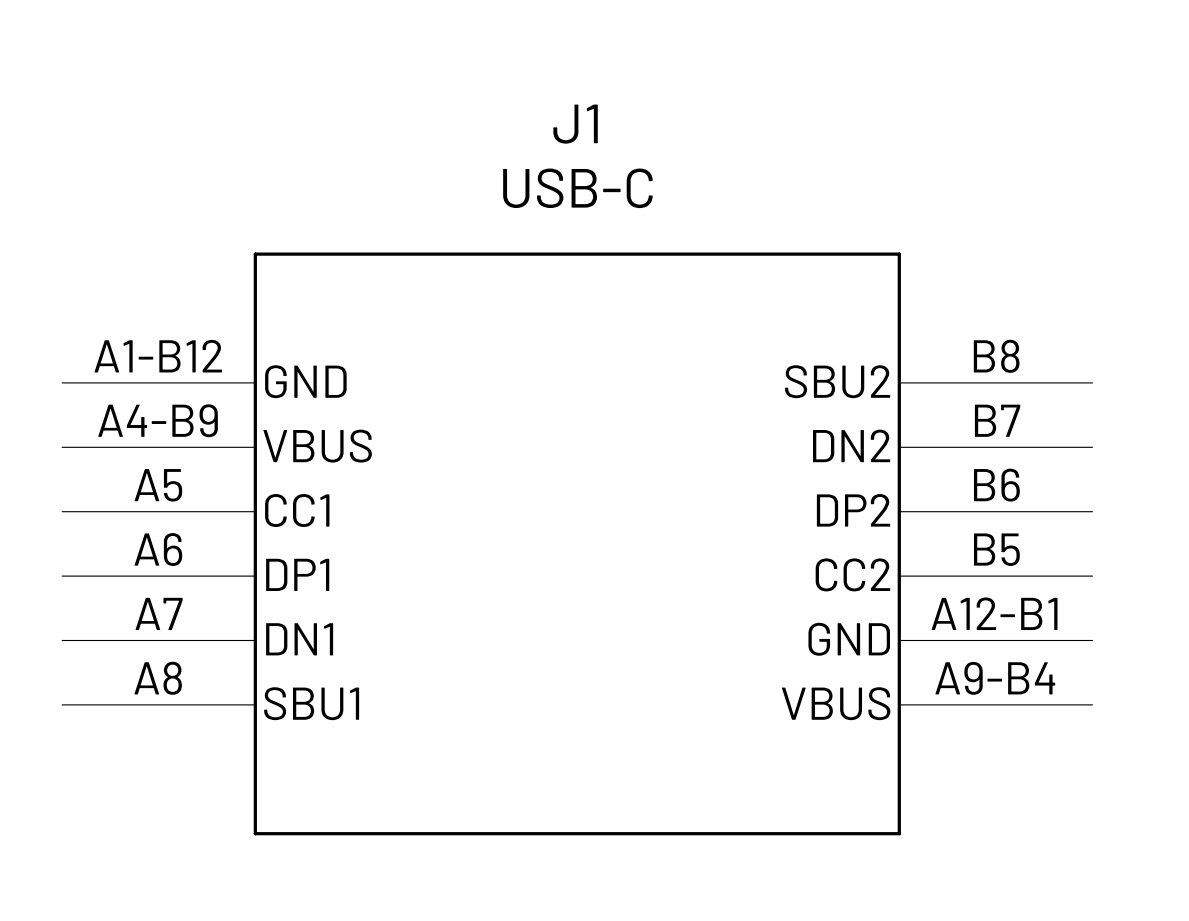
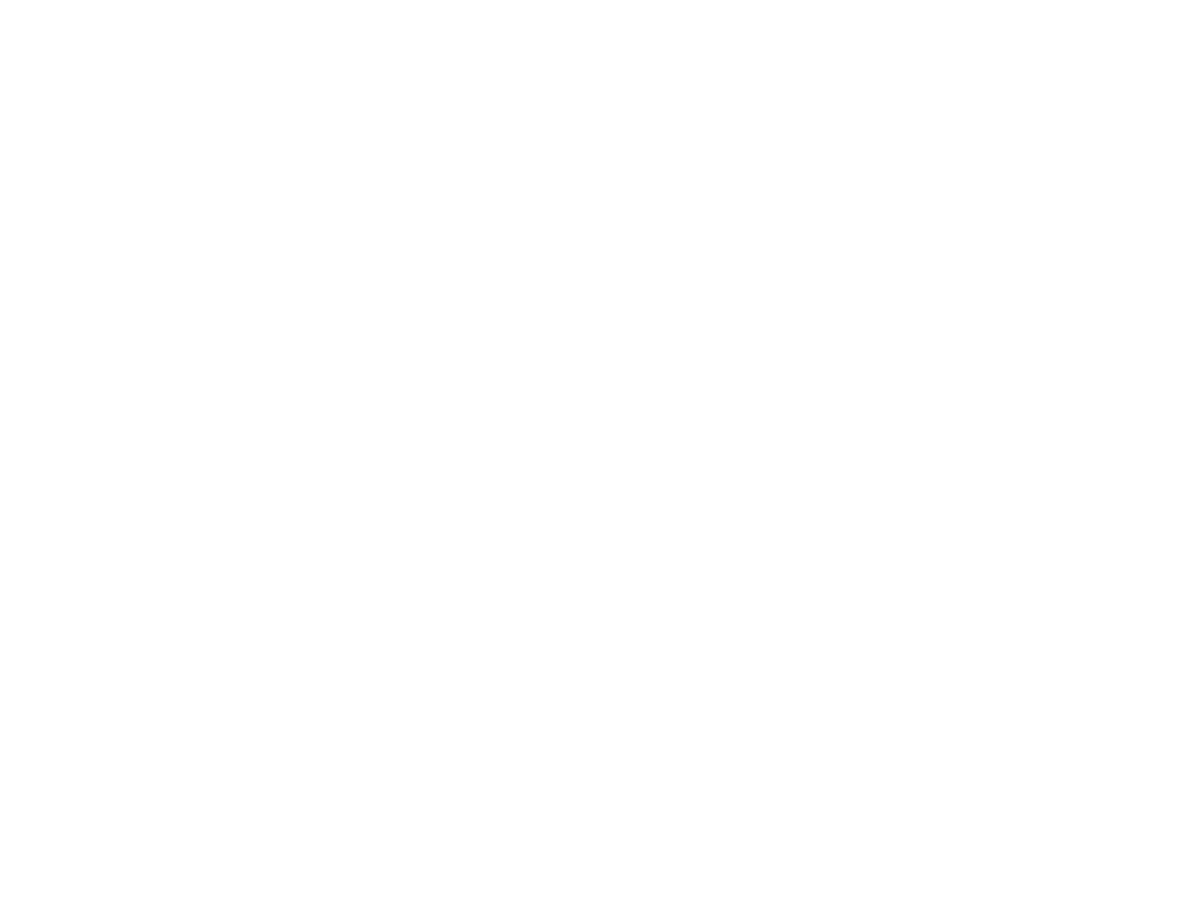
J1: USB-C (577, 543) -> none

